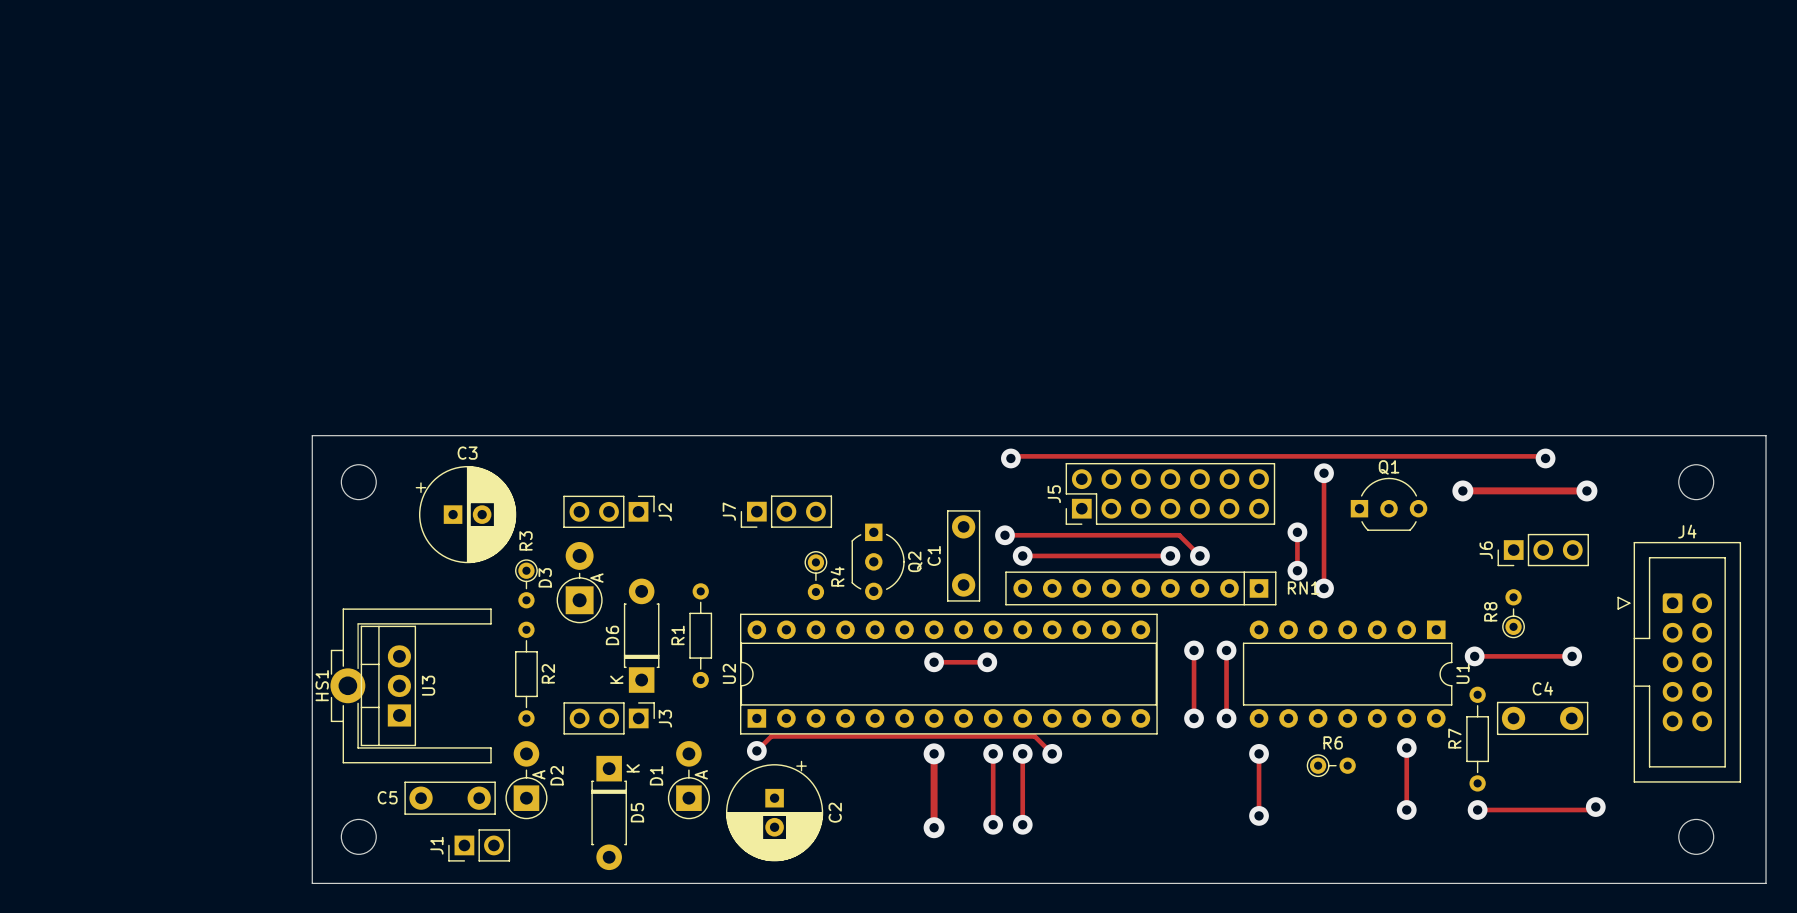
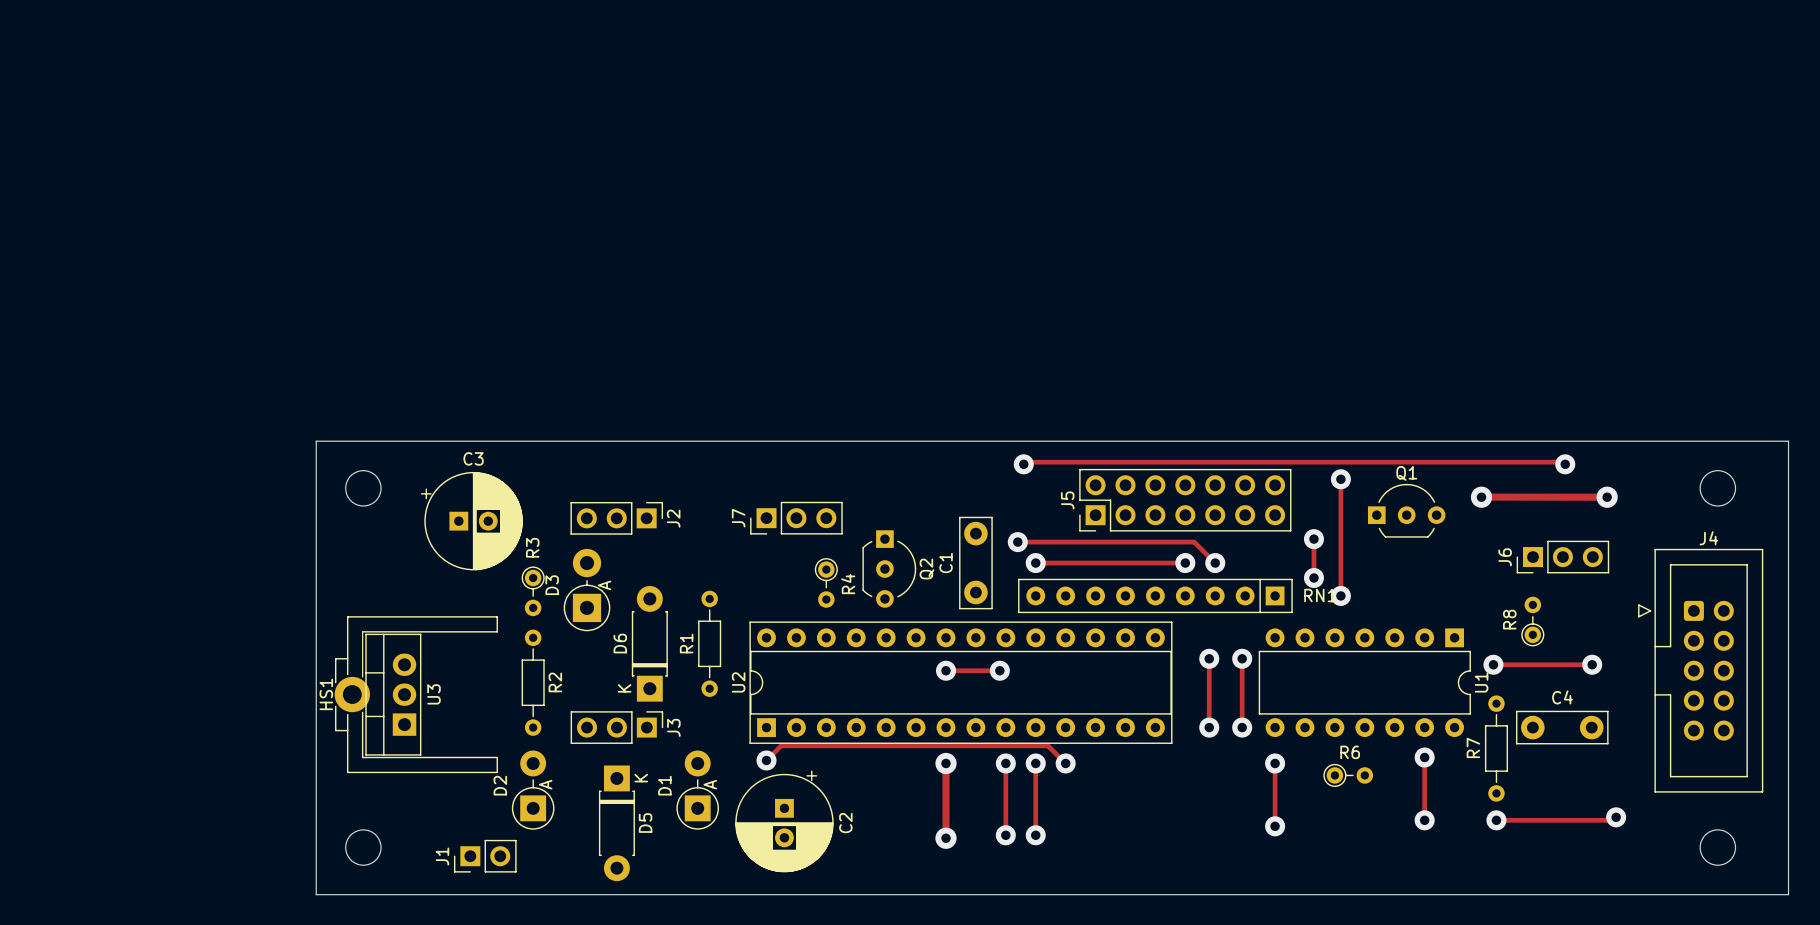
D2 name position: D2 (557, 775) -> D2 (500, 785)
C5: (450, 798) -> none

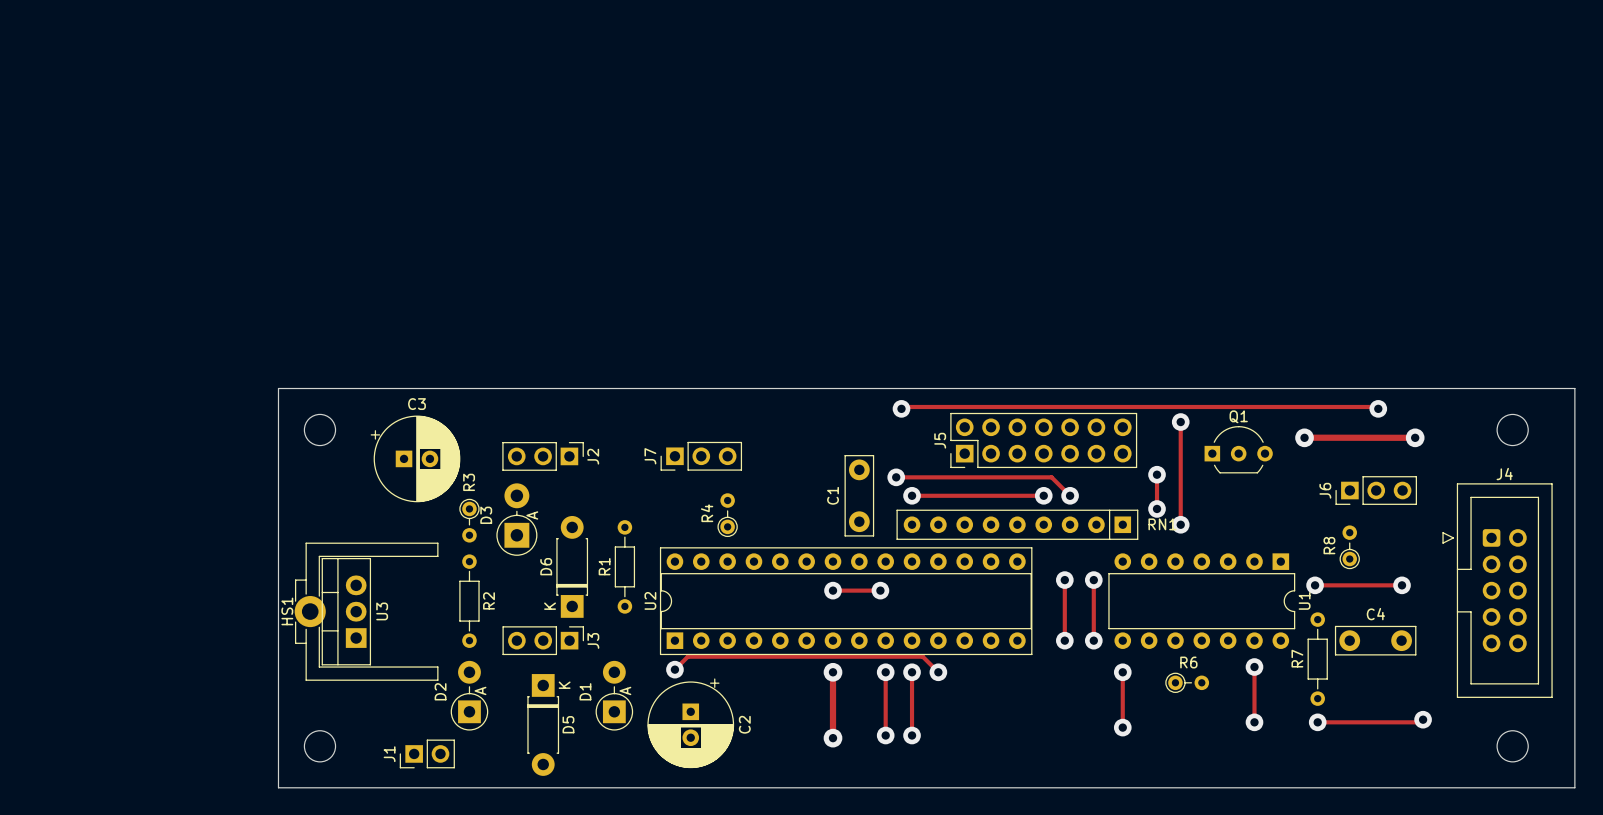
Q2: (889, 569) -> none
R4 rotation: 0° (826, 582) -> 180° (727, 515)

